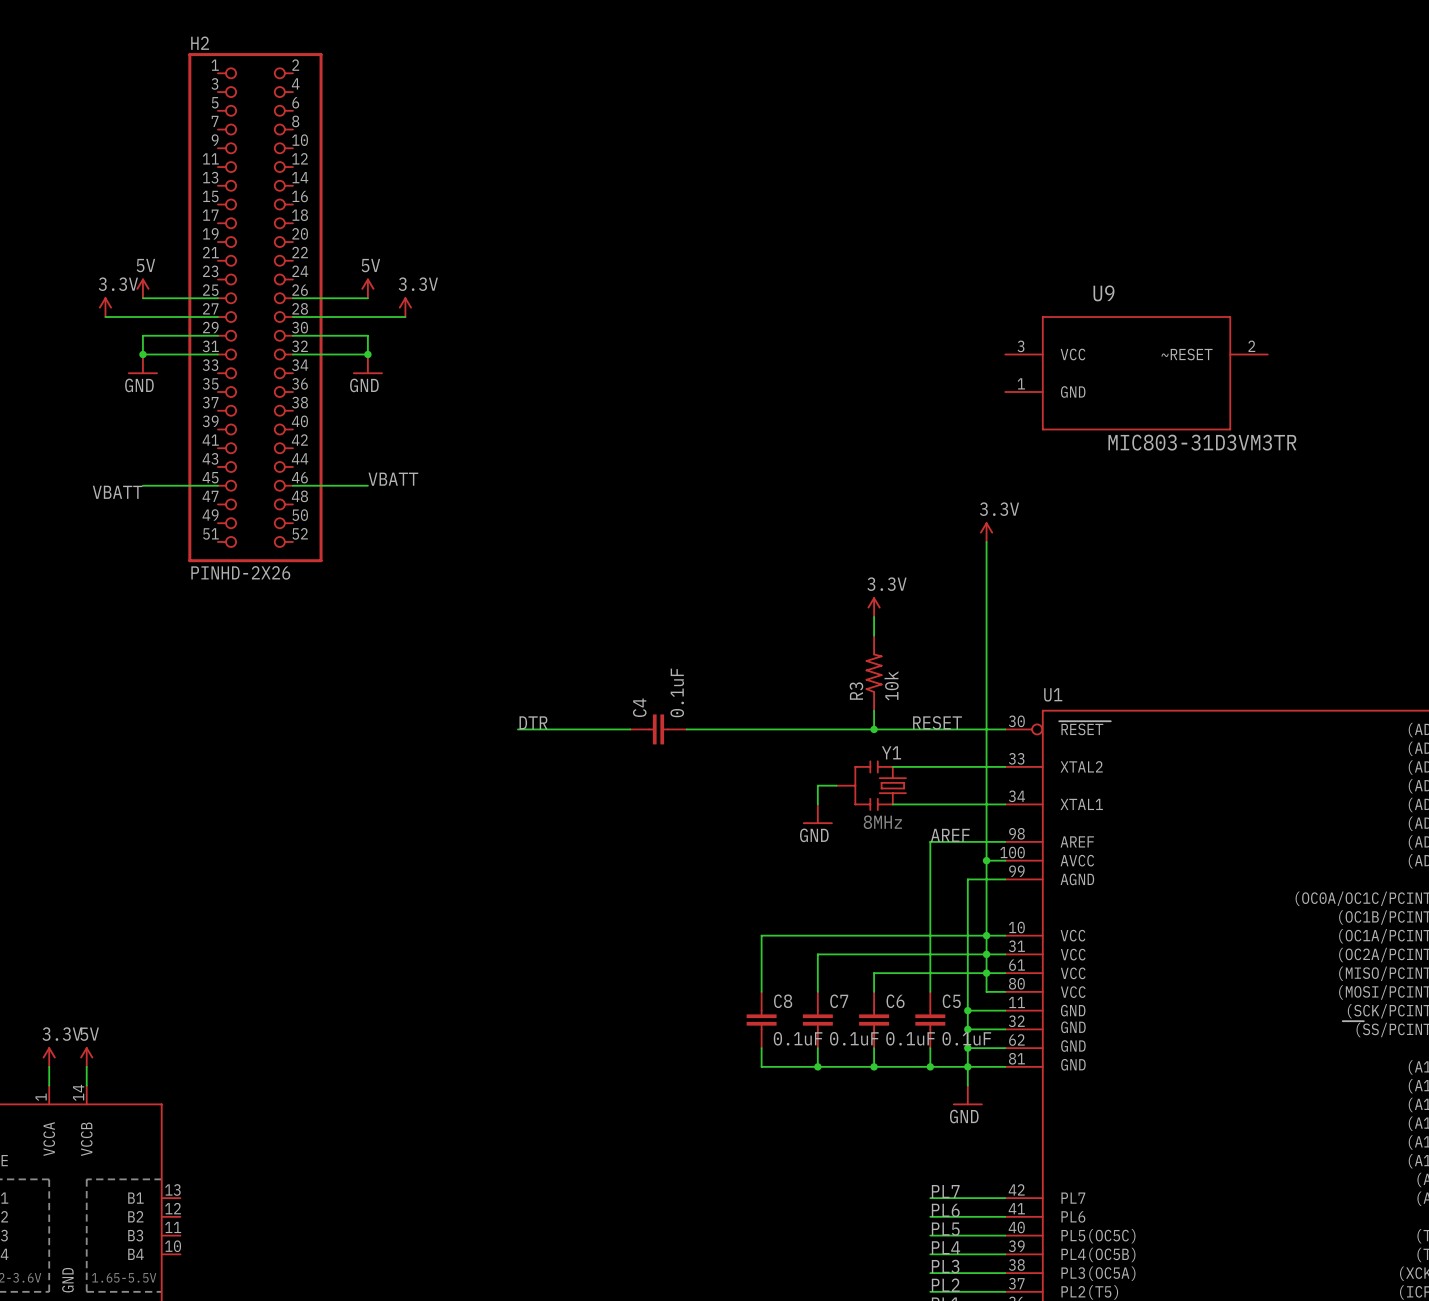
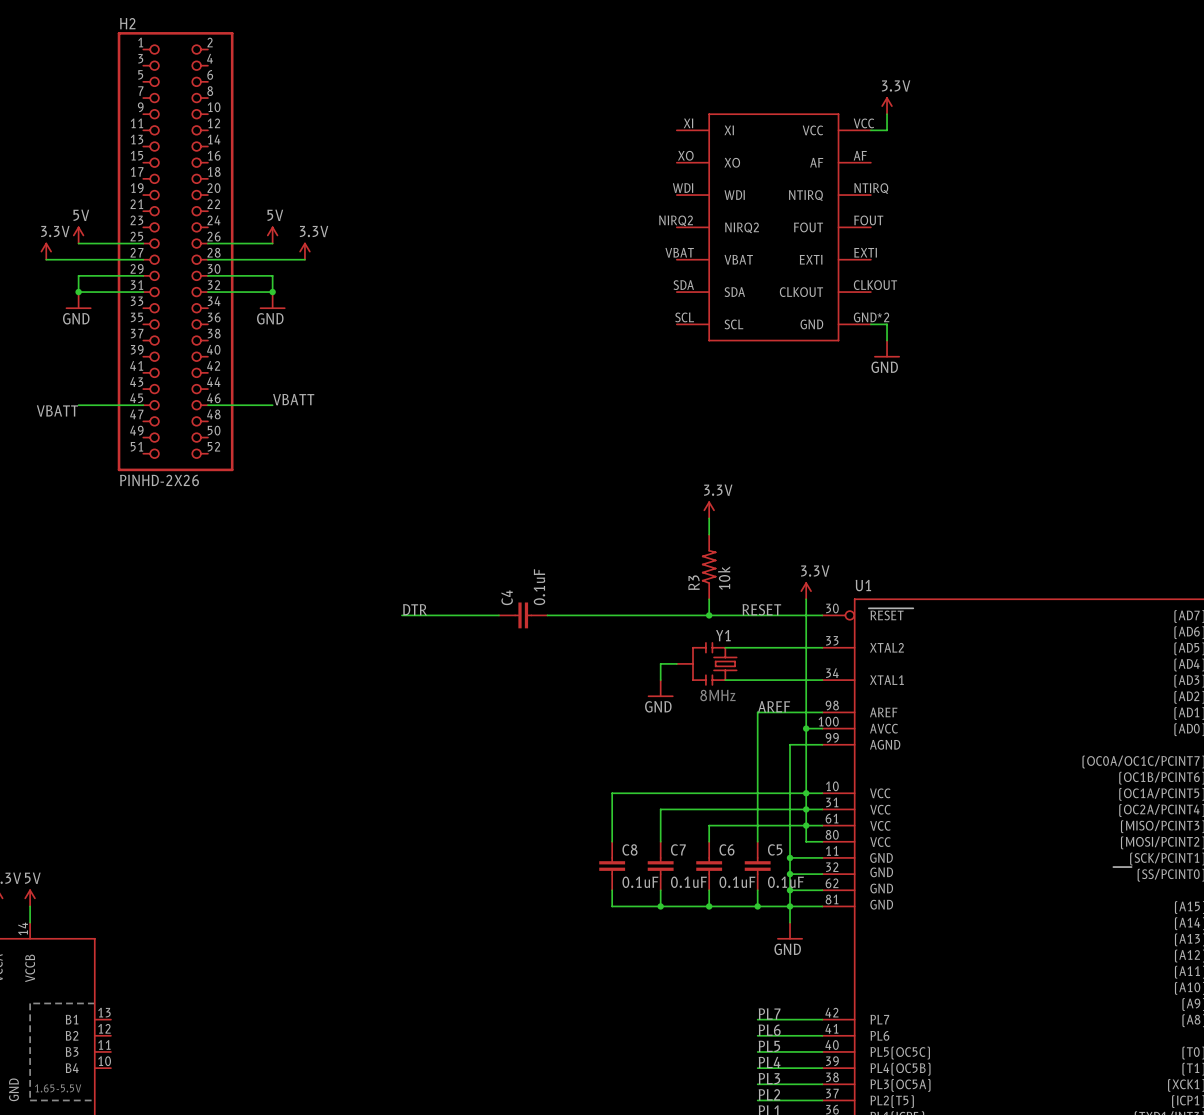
power symbol: none -> 3.3V (887, 105)
wire: none -> (887, 114) (887, 130) (870, 130)
part: none -> (773, 227)
U9: MIC803-31D3VM3TR (1136, 373) -> none
wire: none -> (870, 324) (887, 324) (887, 340)
power symbol: none -> GND (887, 349)
power symbol position: 3.3V (986, 532) -> 3.3V (806, 590)
wire: (986, 541) (986, 710) -> none

